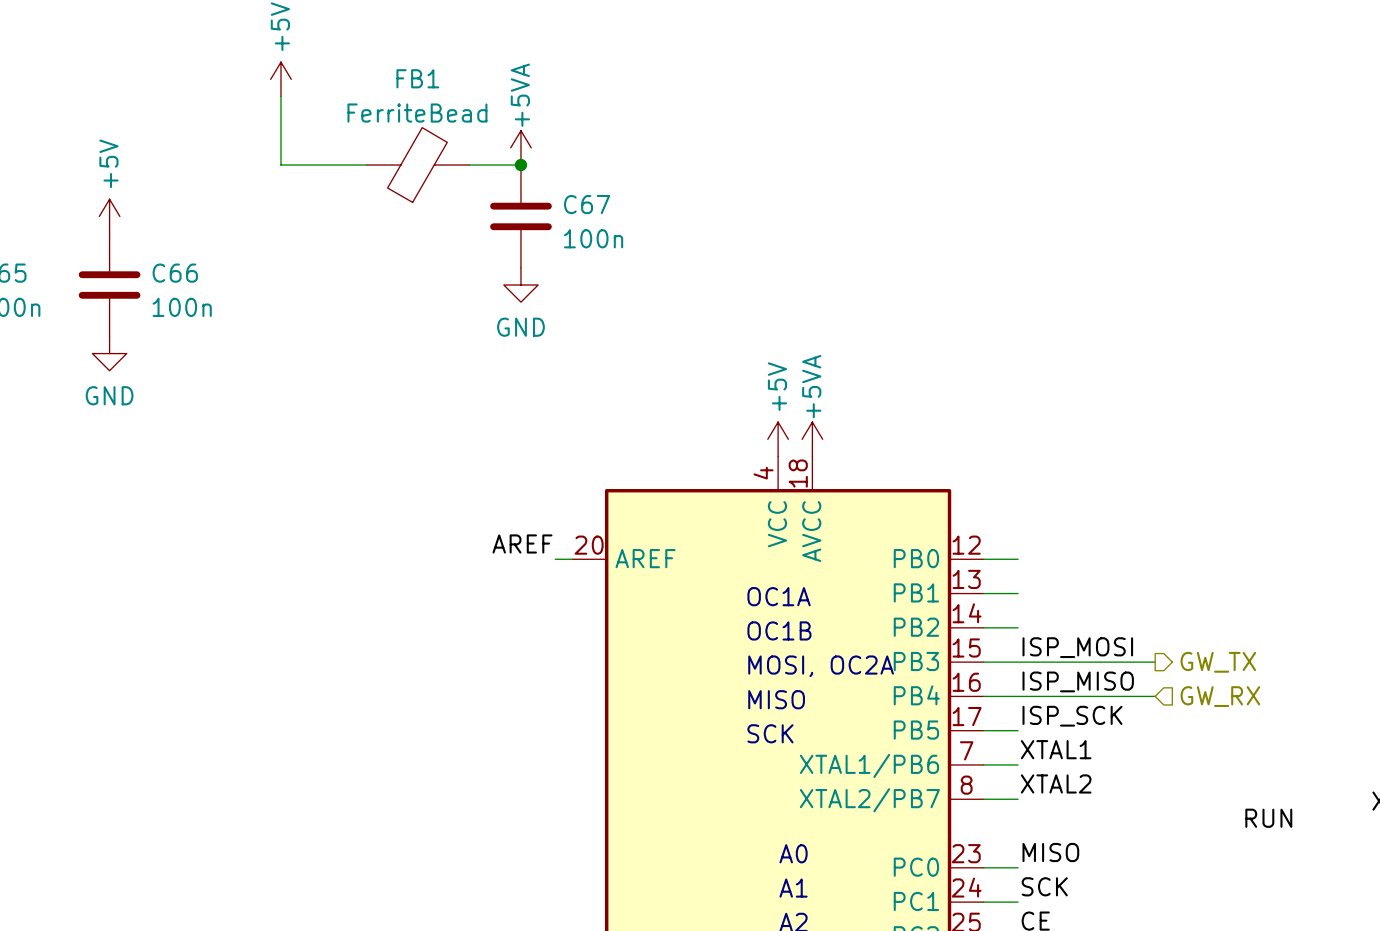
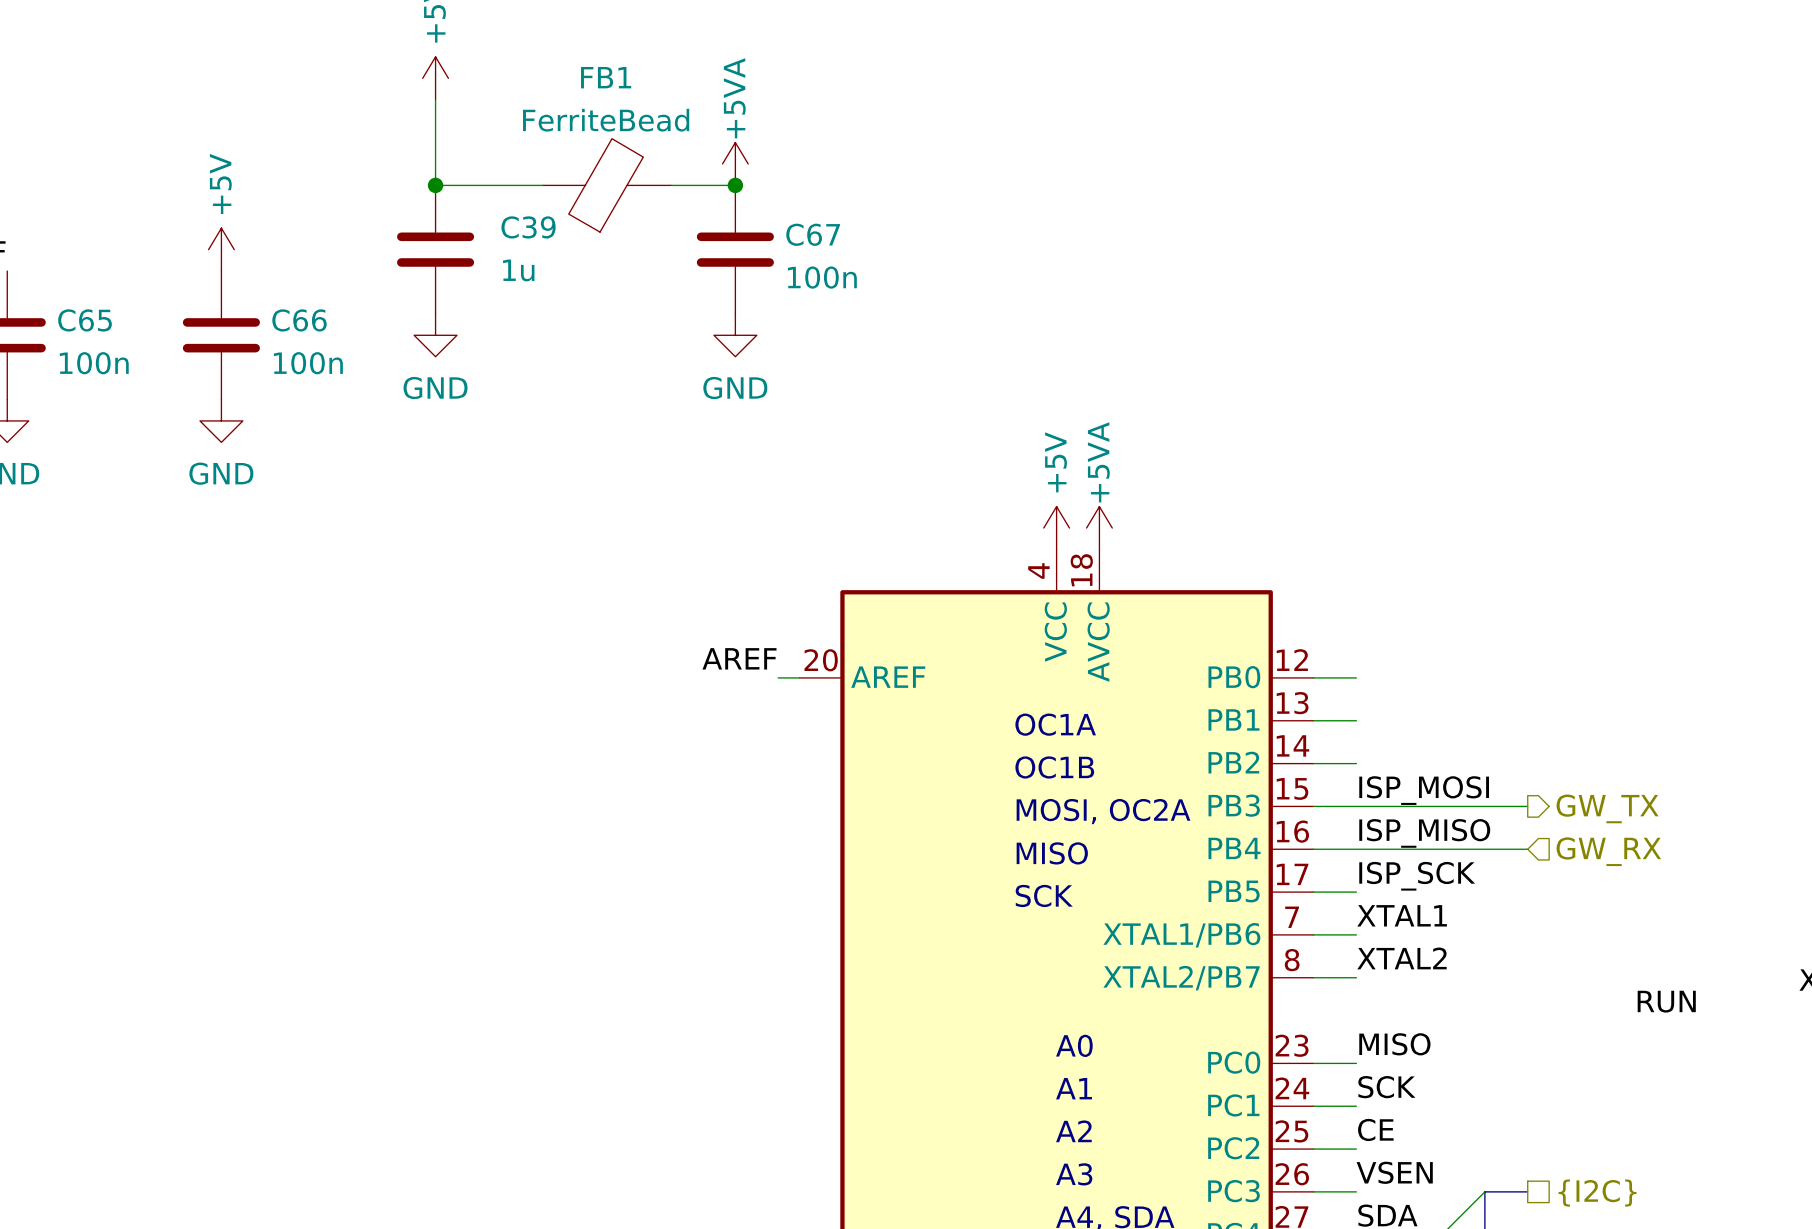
junction: none -> (435, 185)
C39: none -> 1u (435, 249)
power symbol: none -> GND (435, 335)

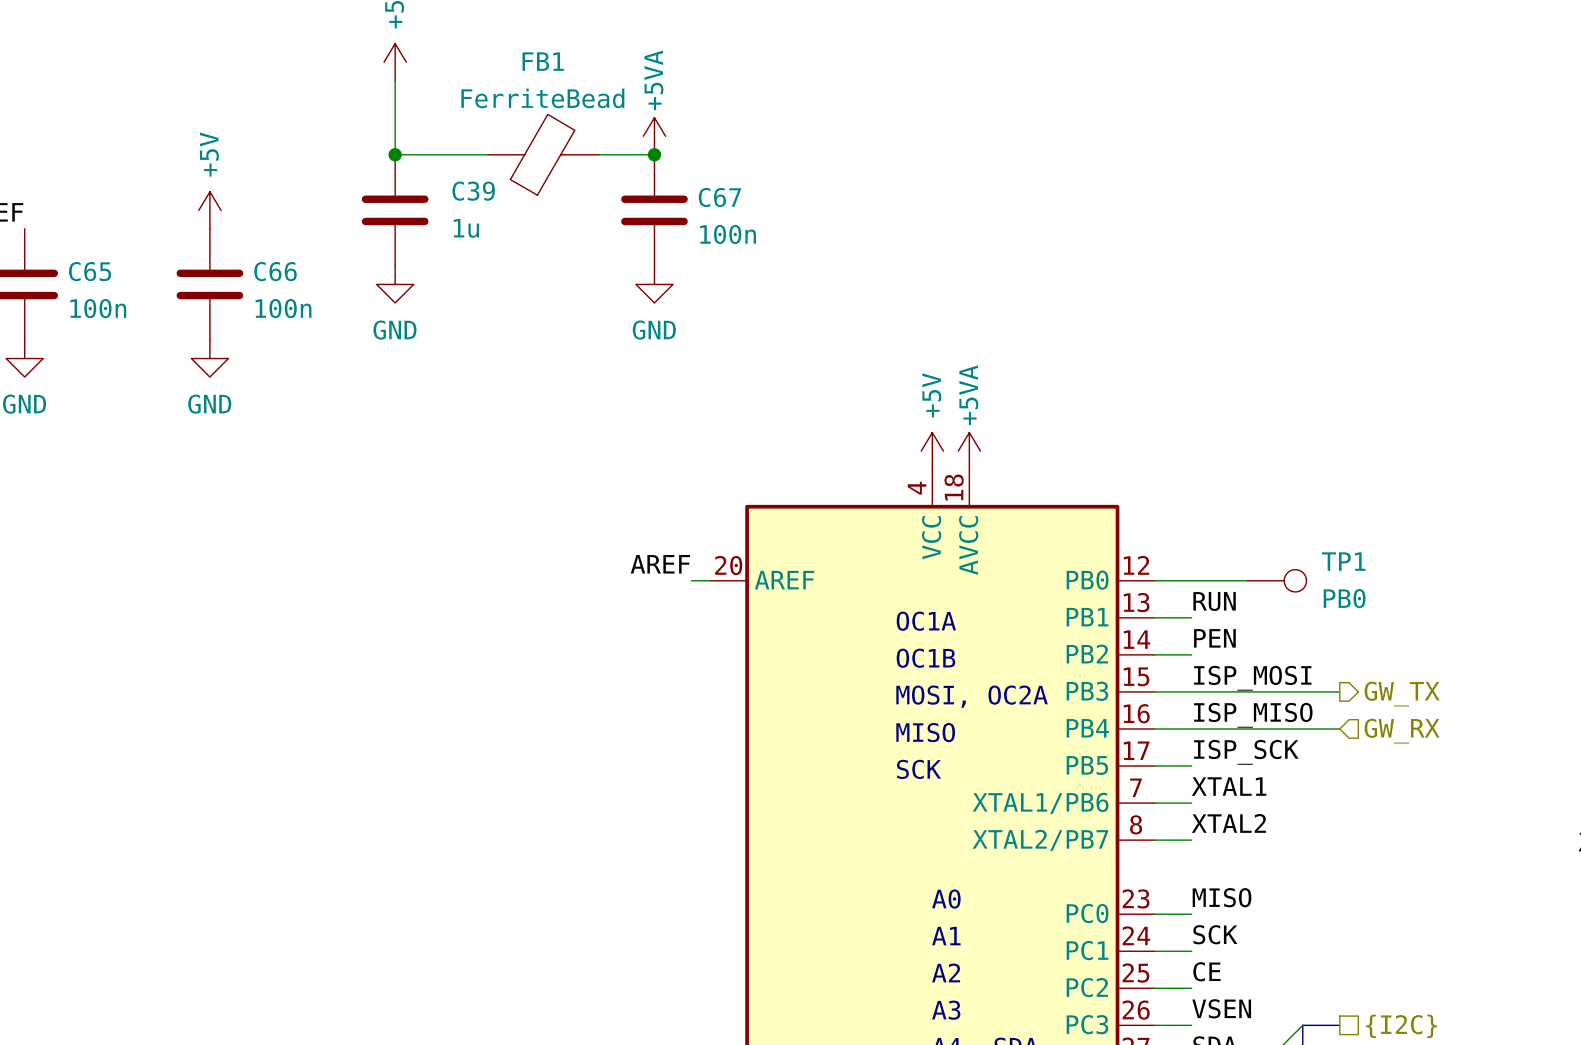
wire: none -> (1191, 580) (1247, 580)
TP1: none -> PB0 (1276, 580)
label: none -> PEN (1214, 638)
label position: RUN (1666, 1001) -> RUN (1214, 601)

